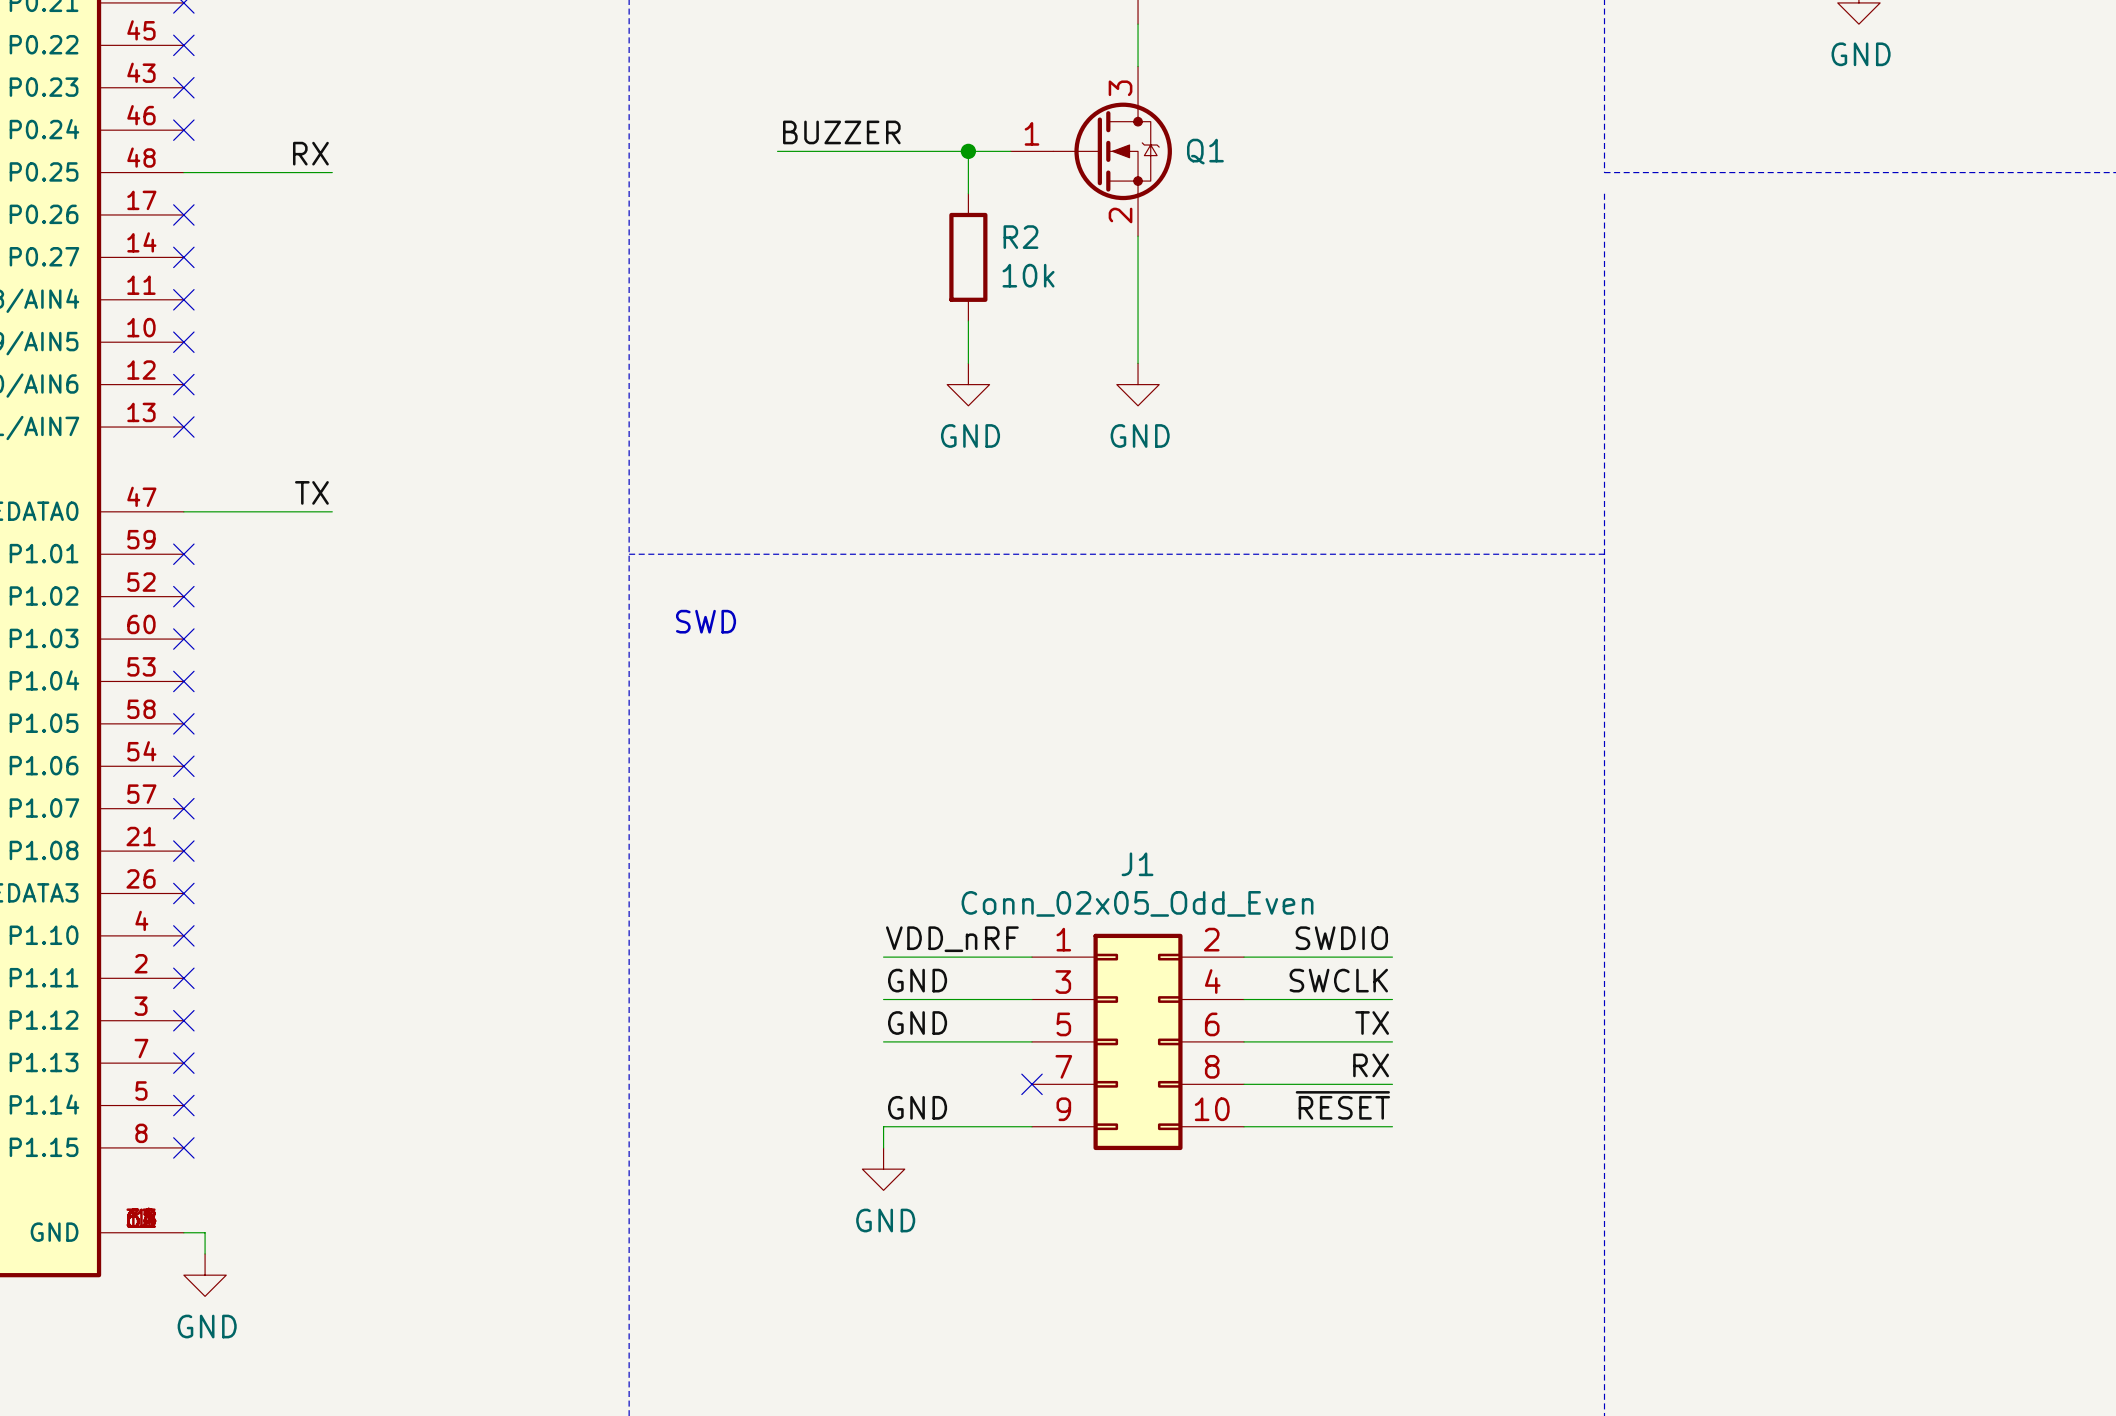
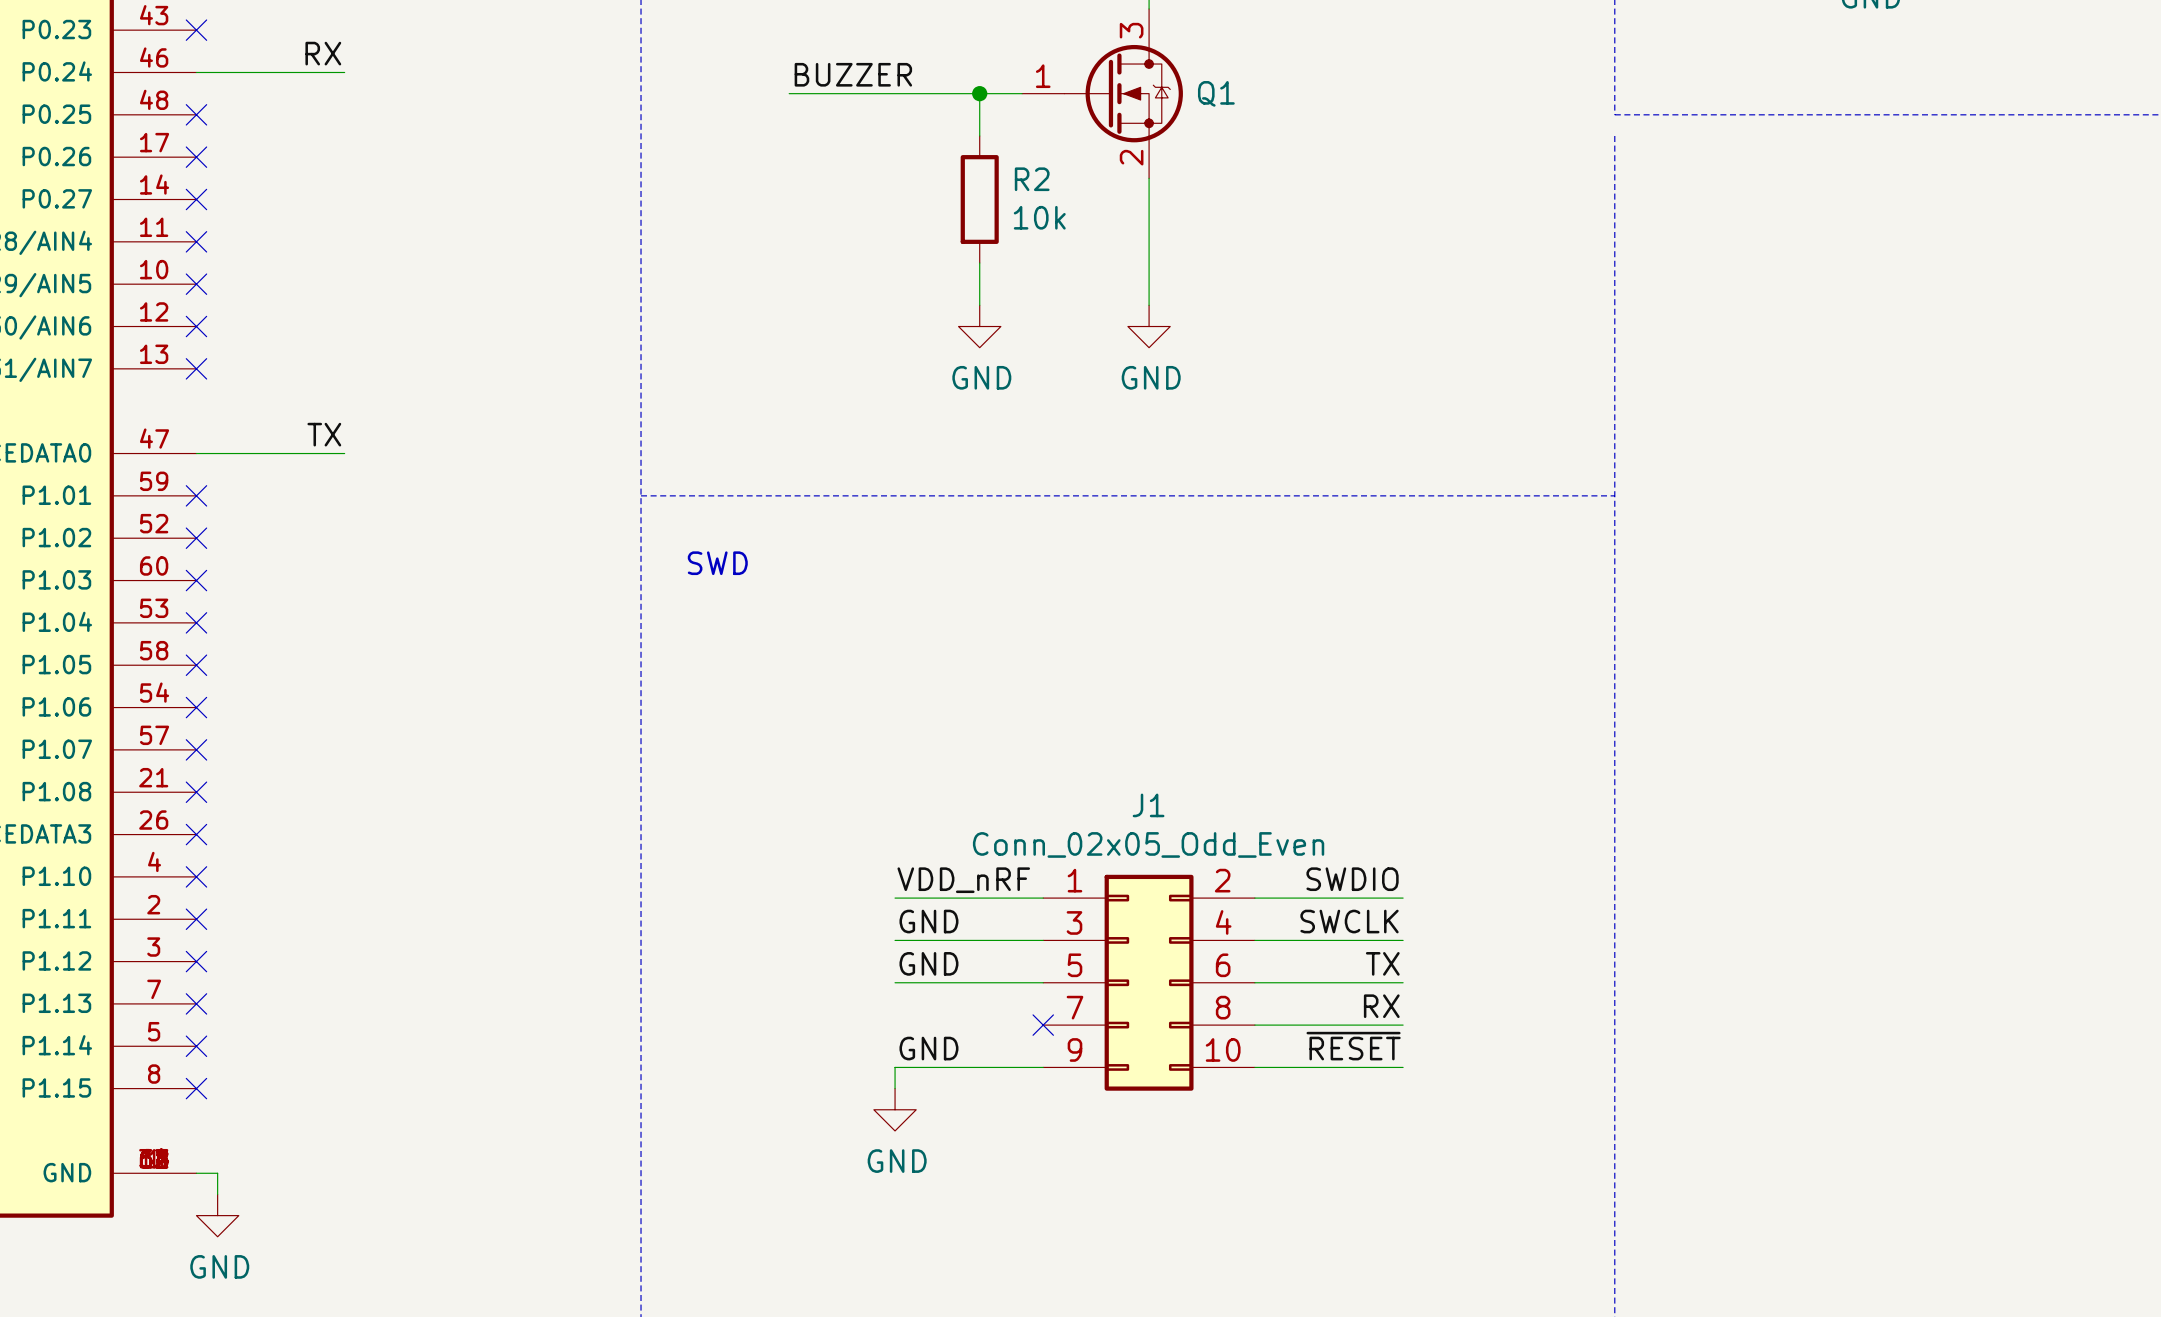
no-connect mark position: (183, 130) -> (196, 114)
label position: RX (310, 153) -> RX (323, 53)
wire: (183, 172) (332, 172) -> (196, 72) (344, 72)

